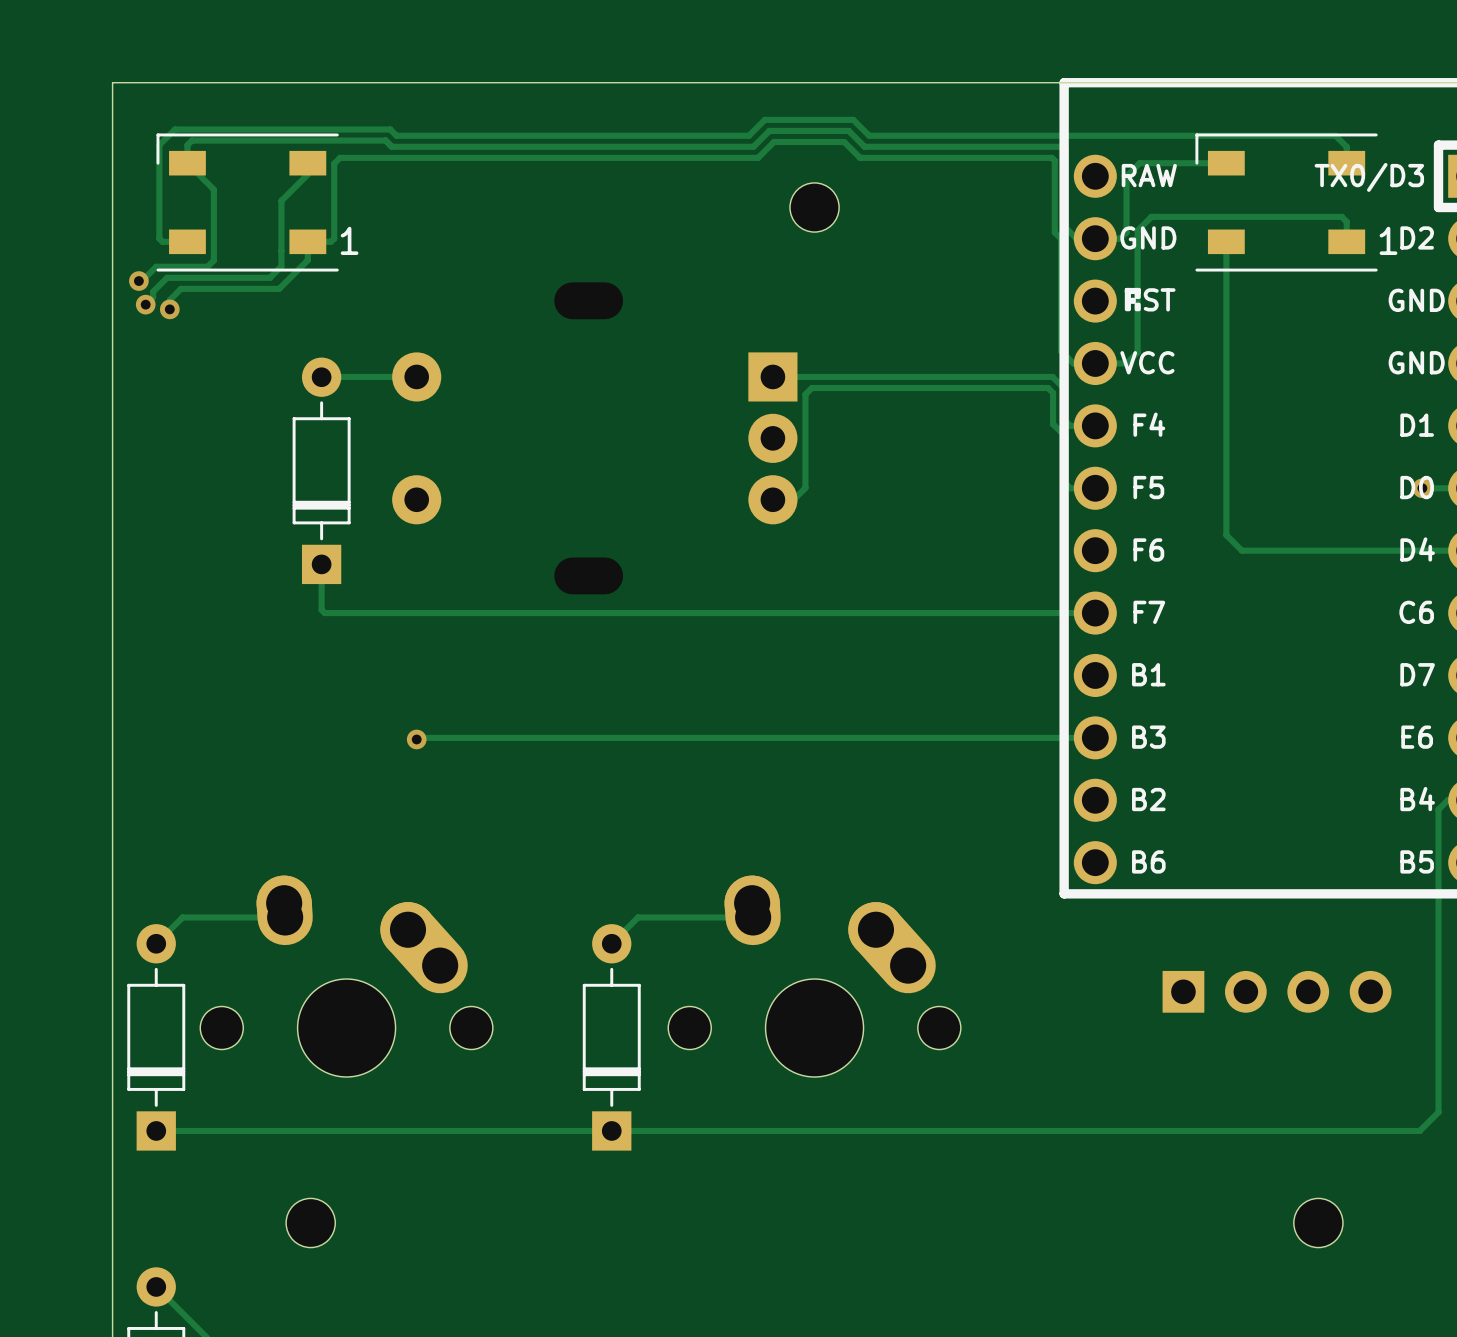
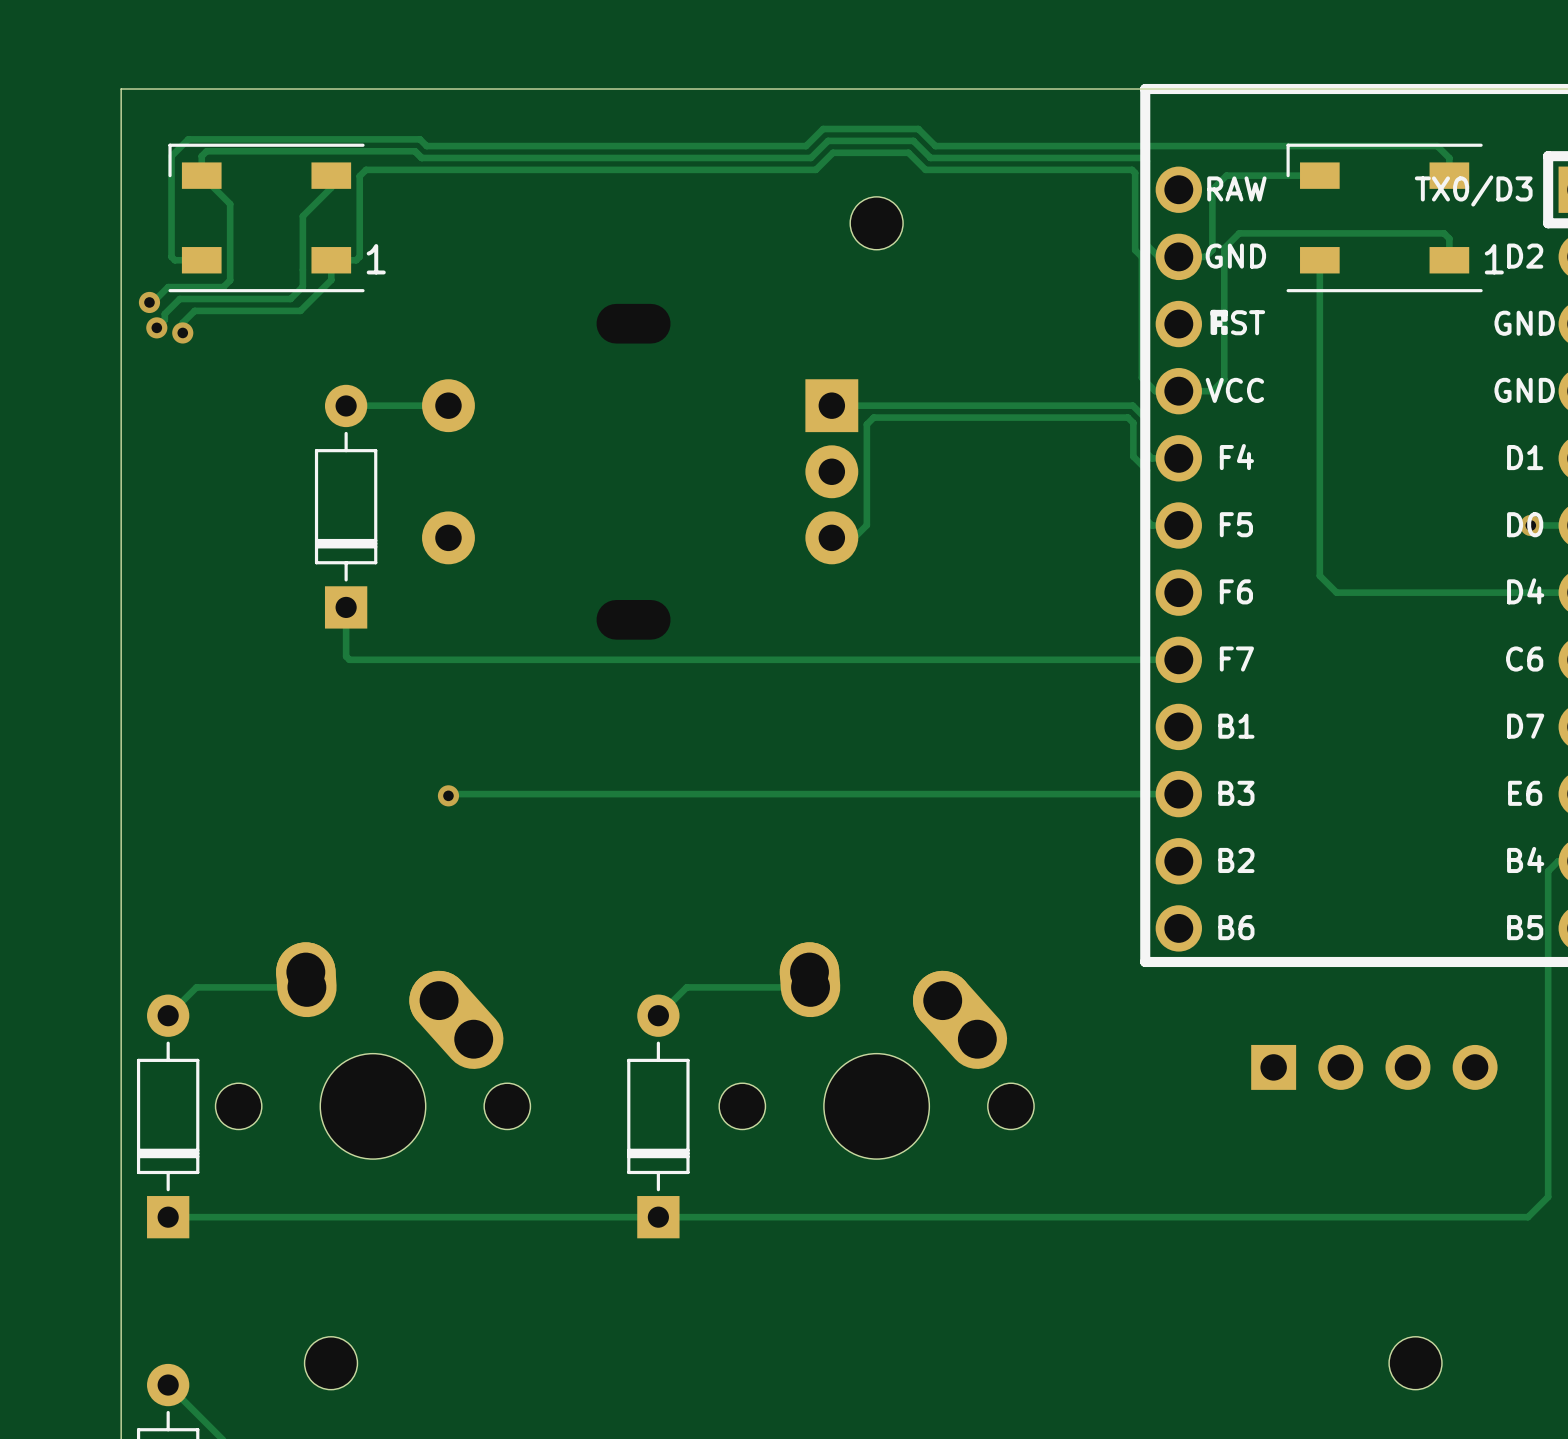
part position: (310, 1223) -> (331, 1363)
part position: (1318, 1223) -> (1415, 1363)

